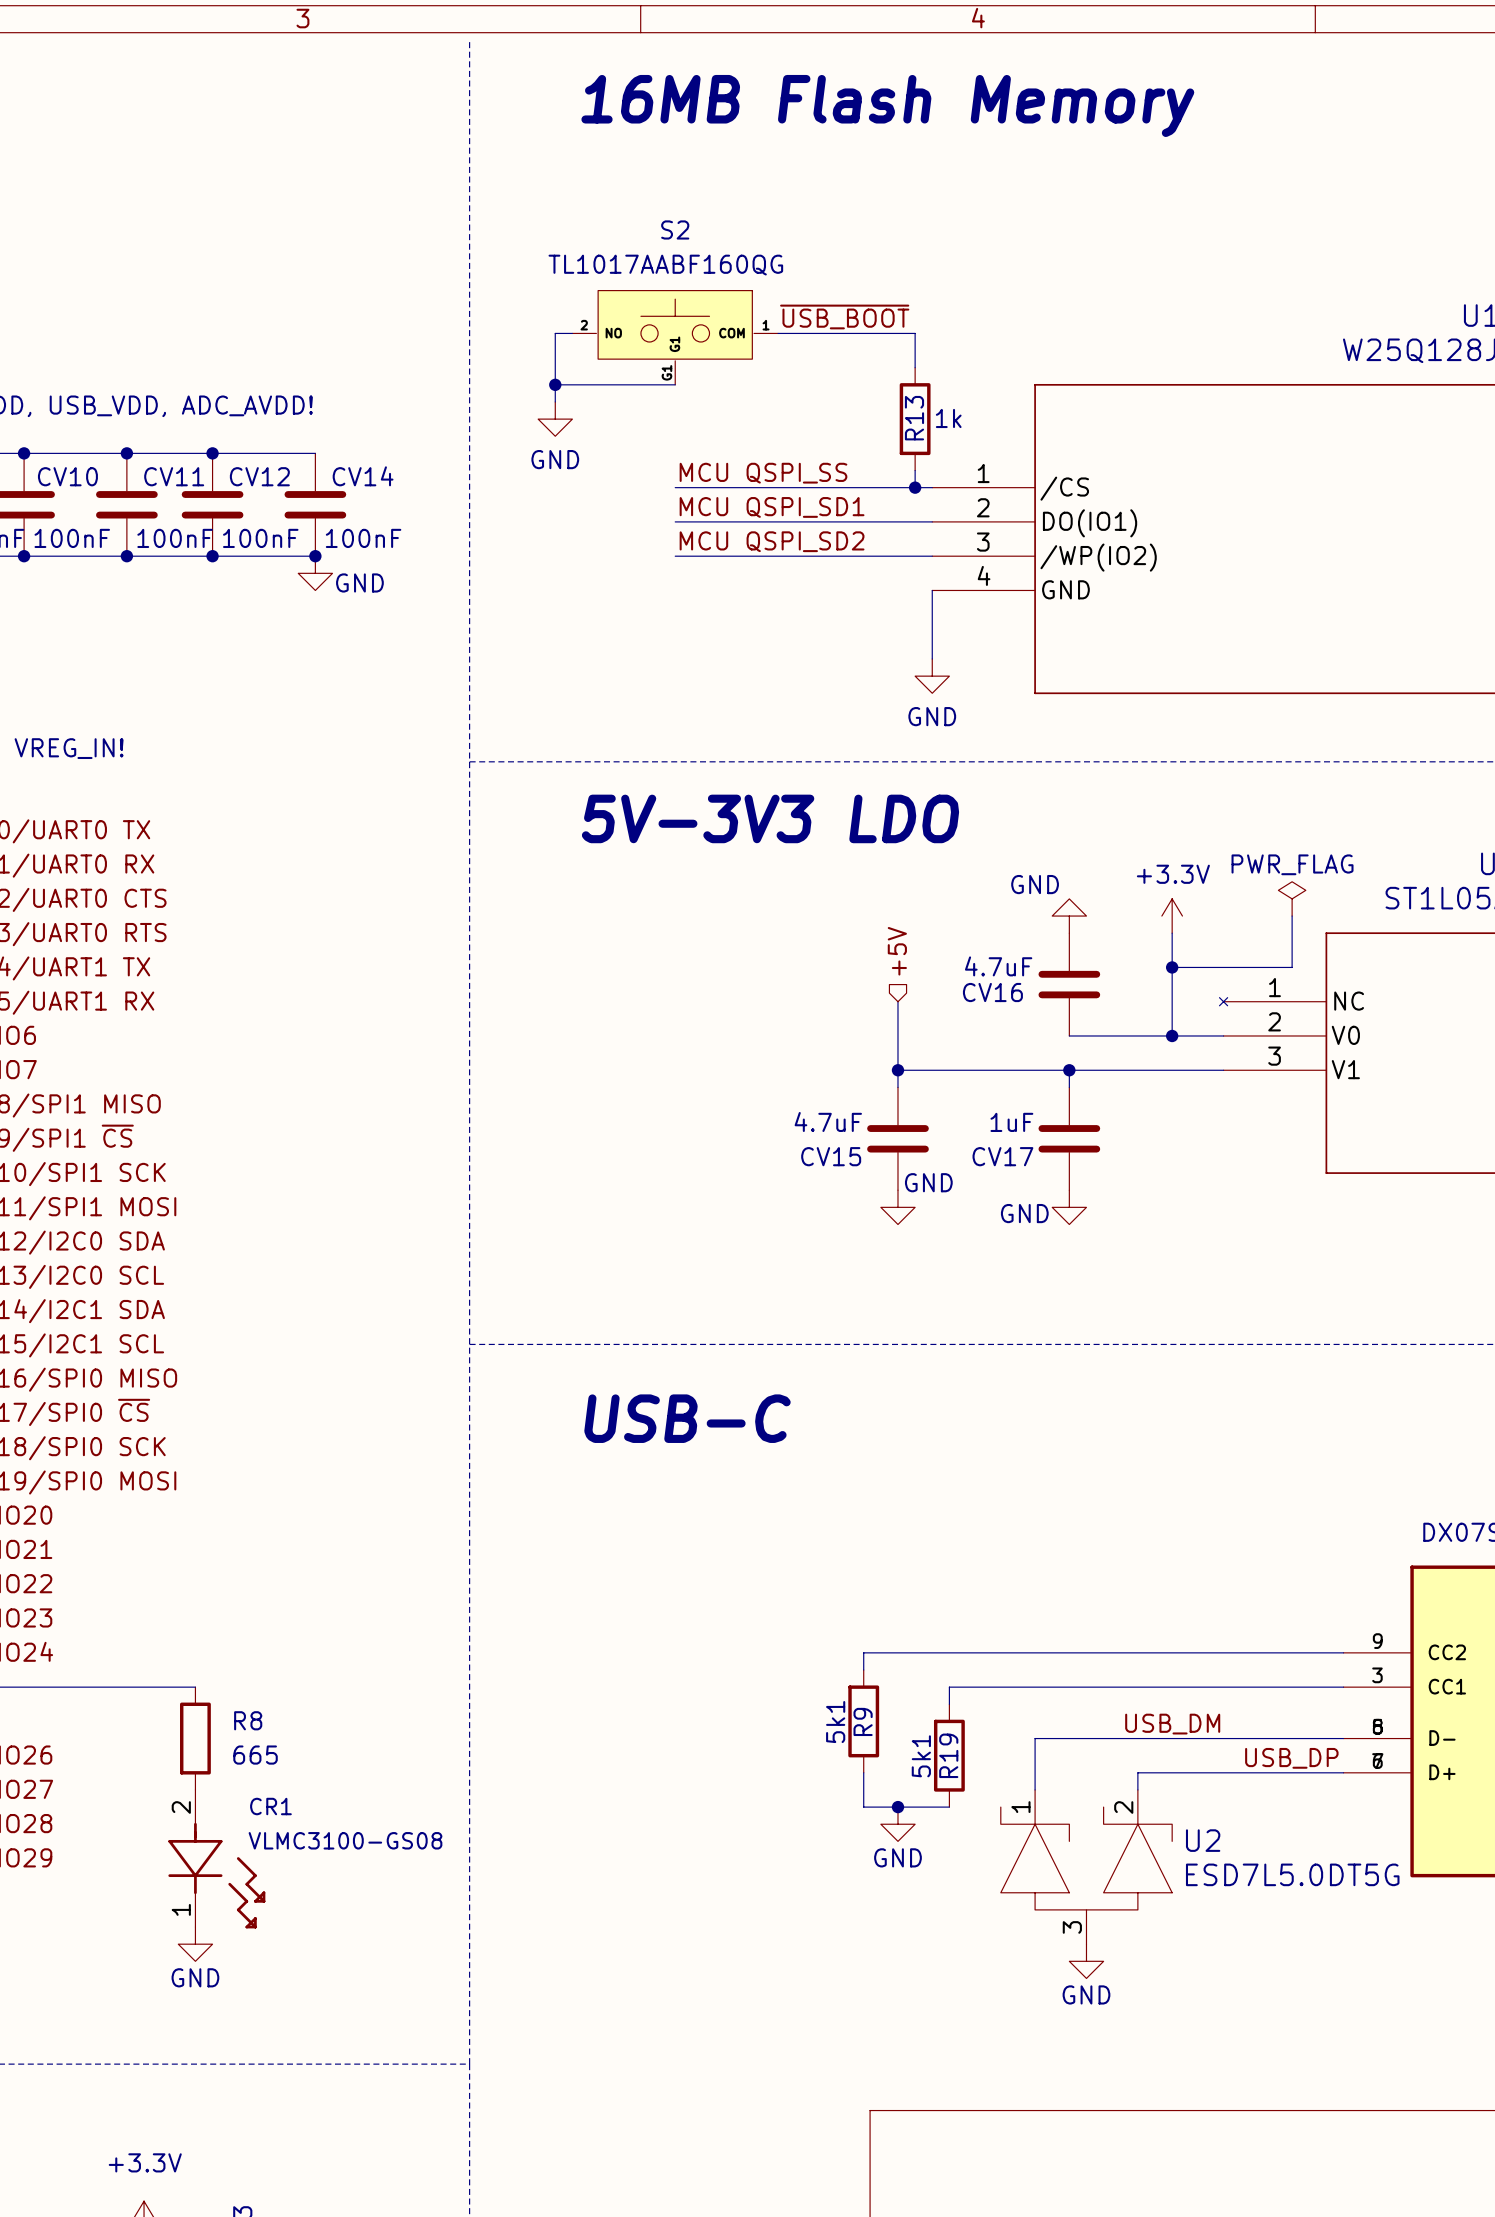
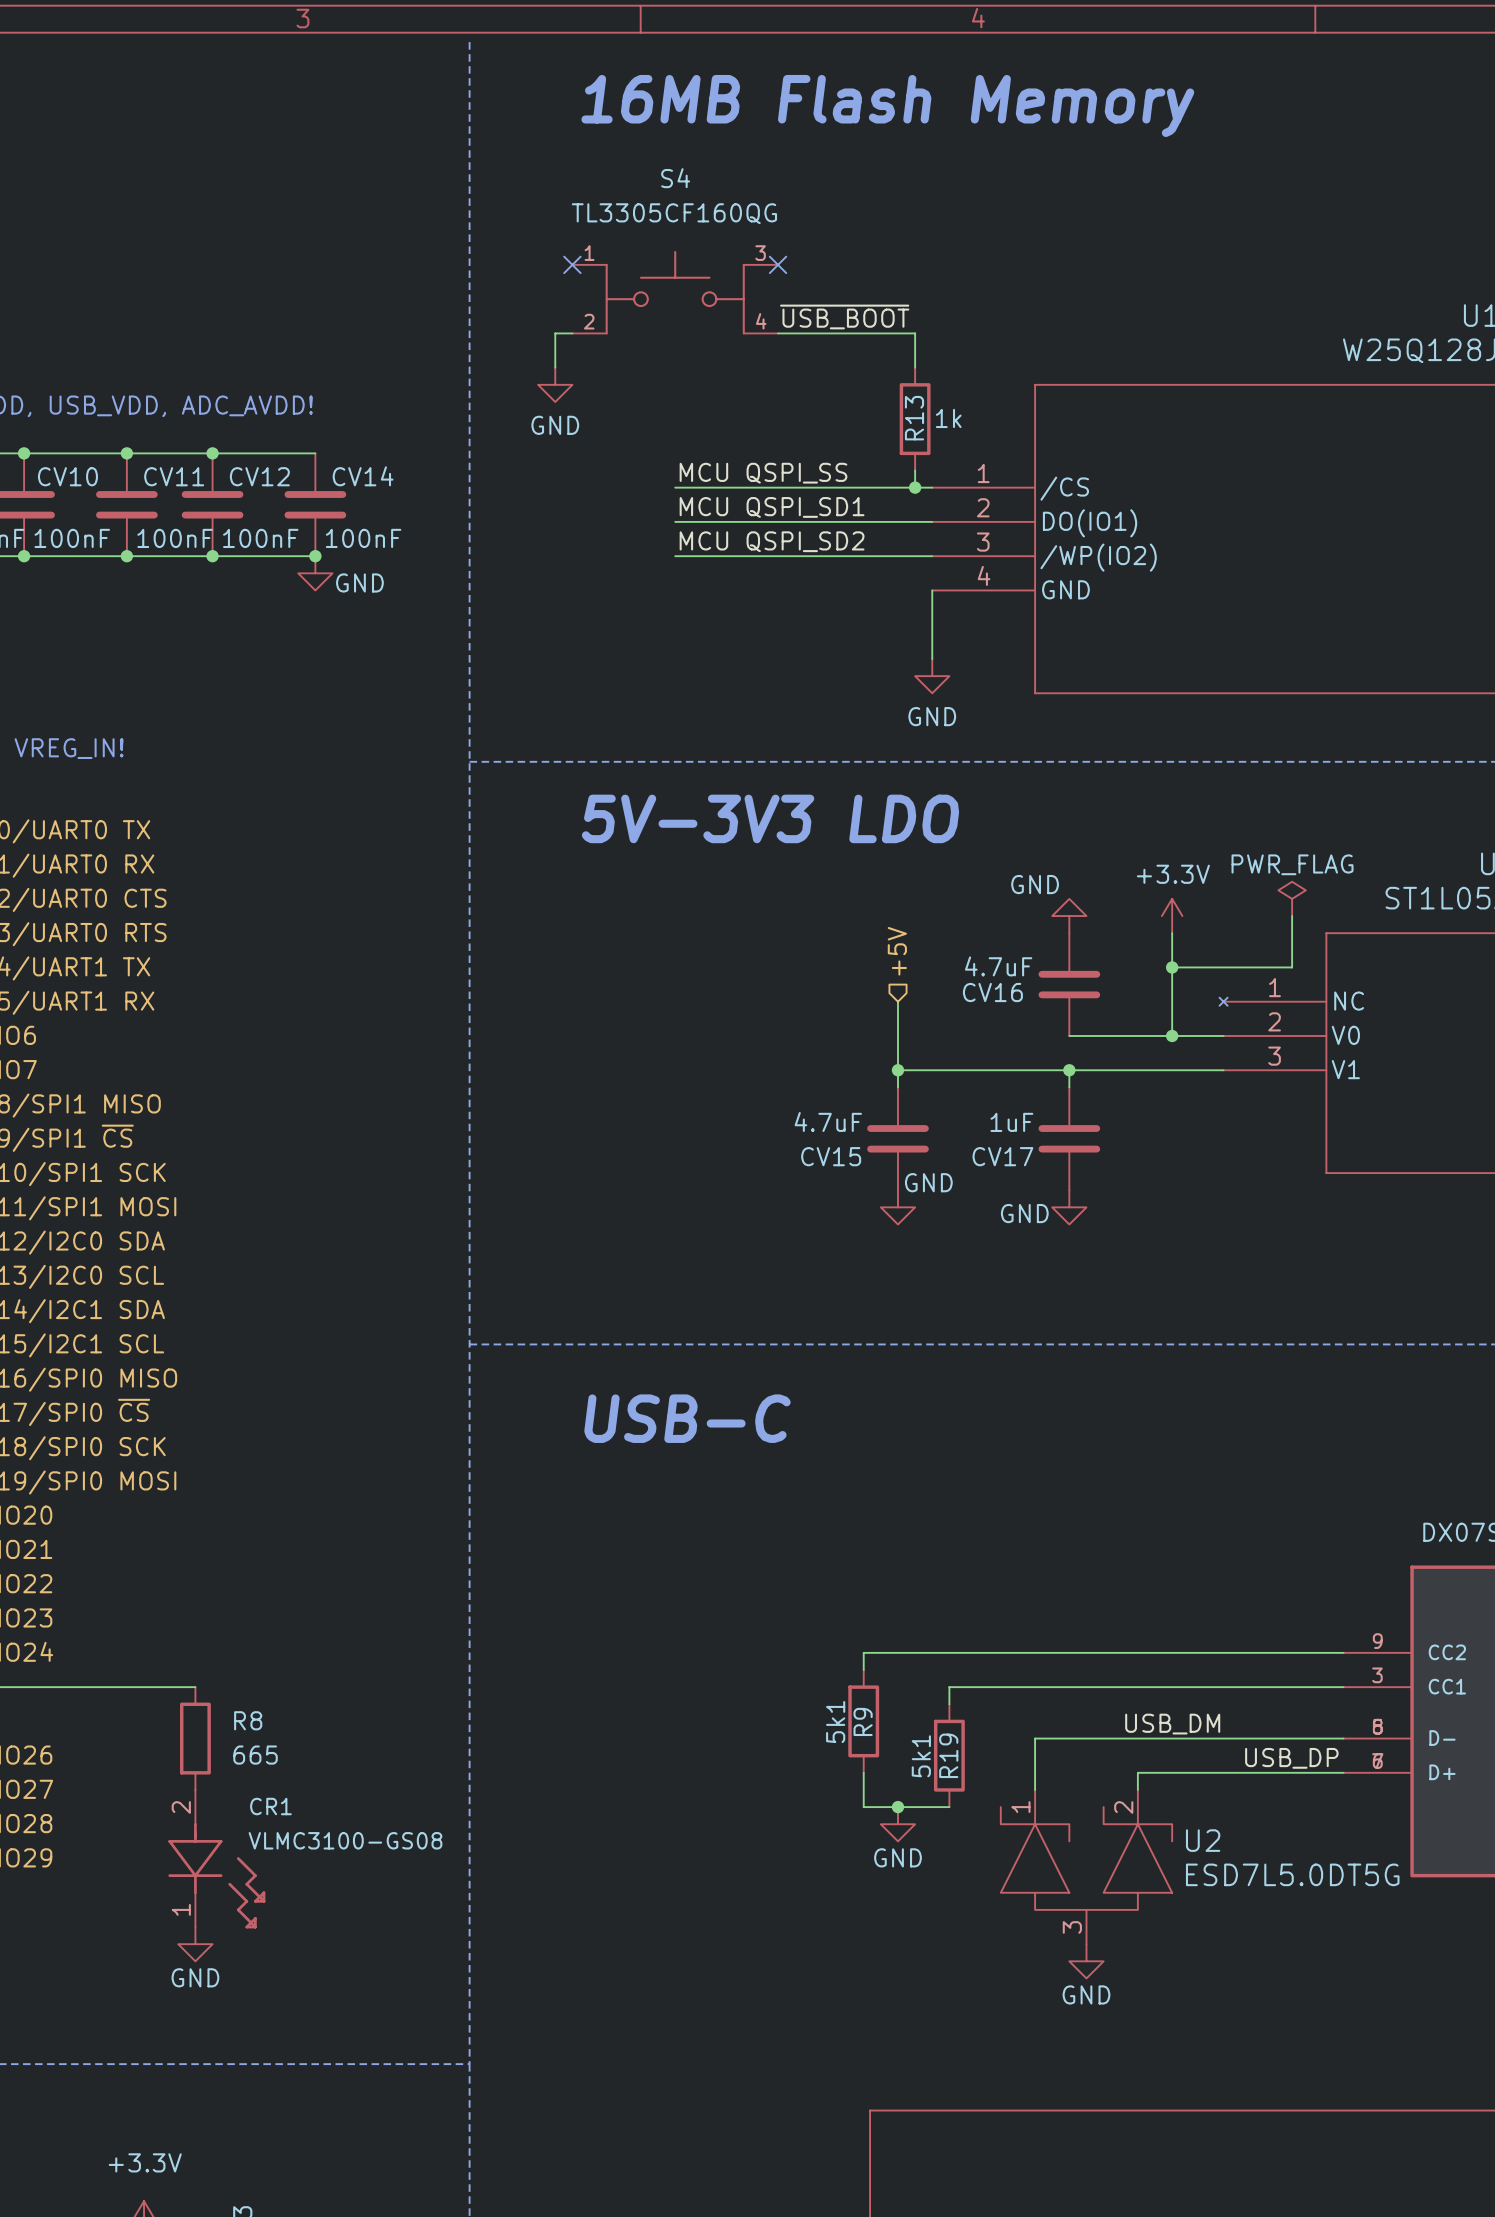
no-connect mark: none -> (572, 264)
no-connect mark: none -> (778, 264)
S4: none -> TL3305CF160QG (675, 292)
S2: TL1017AABF160QG (675, 337) -> none
wire: (555, 384) (675, 384) -> none
junction: (555, 384) -> none
power symbol position: GND (555, 419) -> GND (555, 384)

